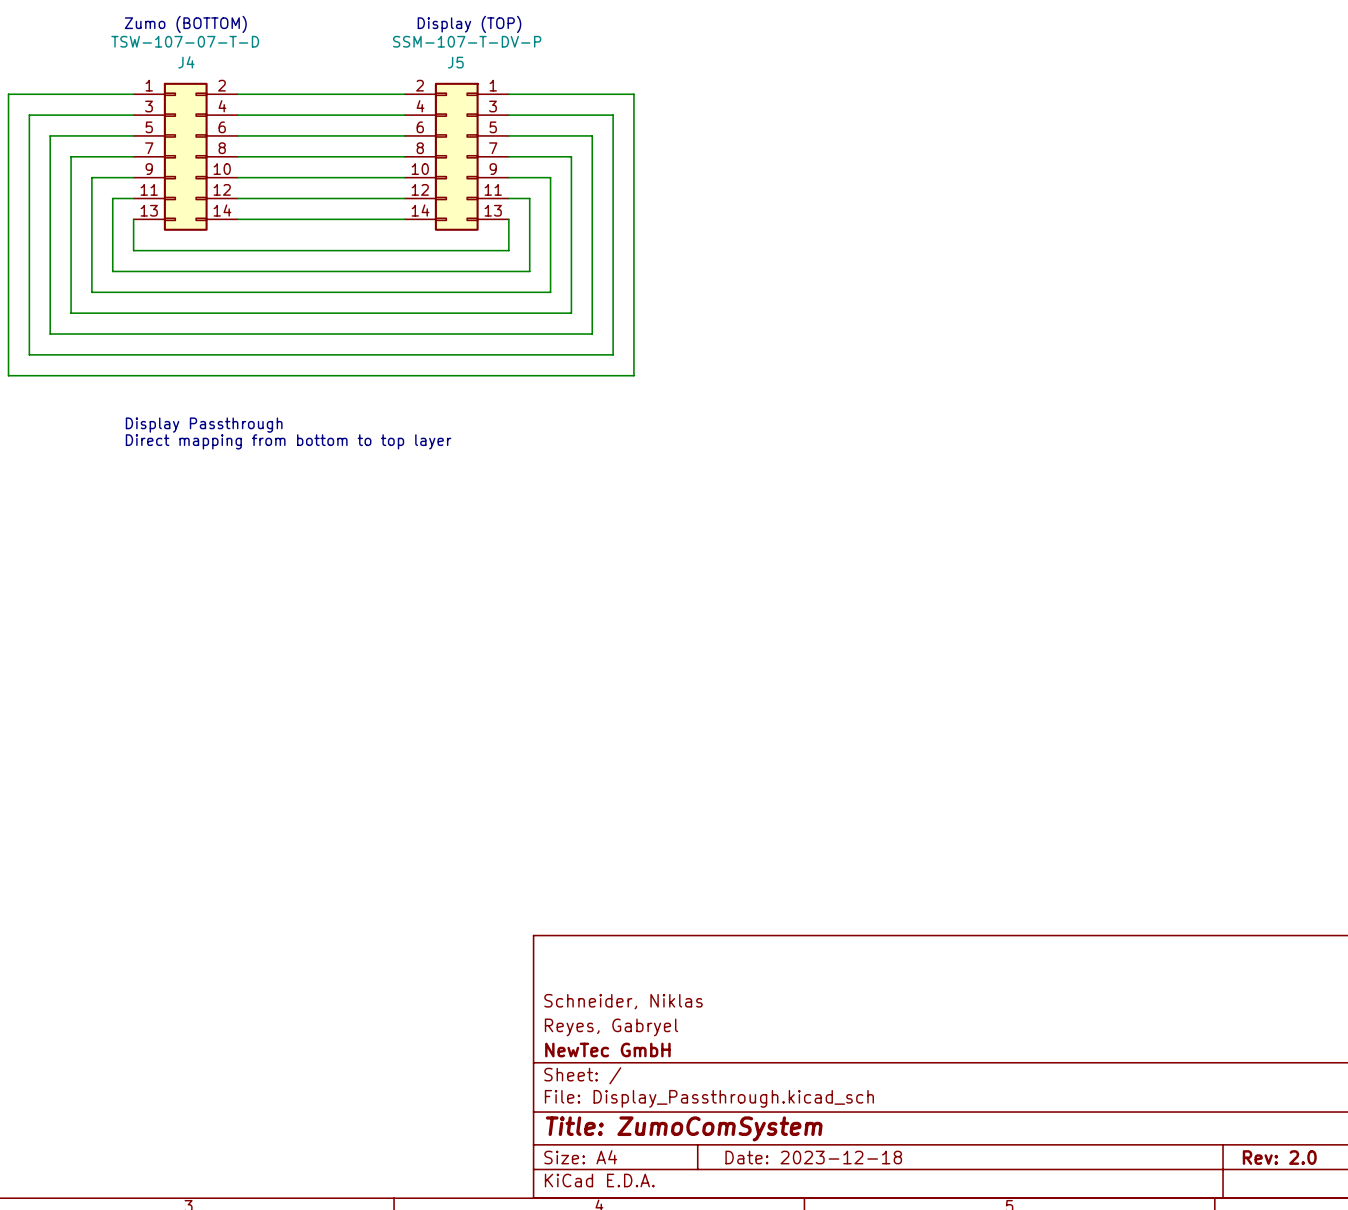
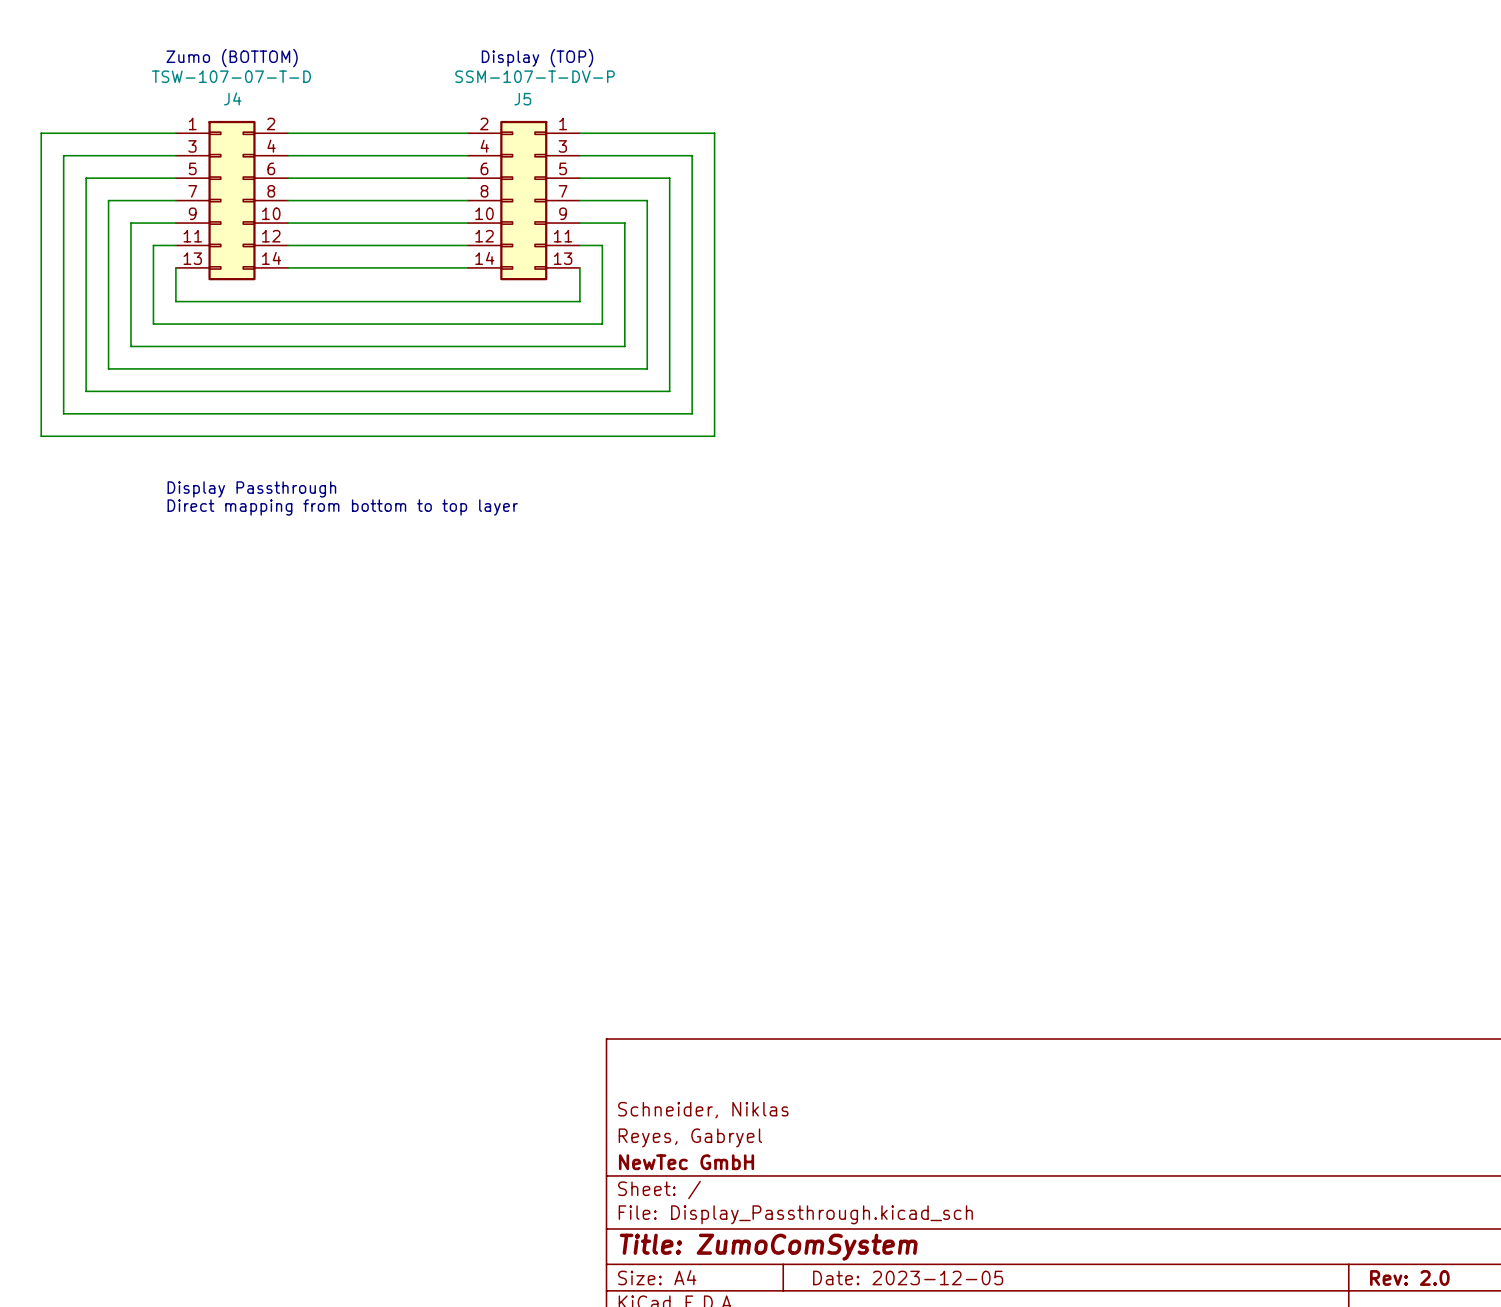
title block: Date: 2023-12-18 (813, 1157) -> Date: 2023-12-05 (908, 1277)

